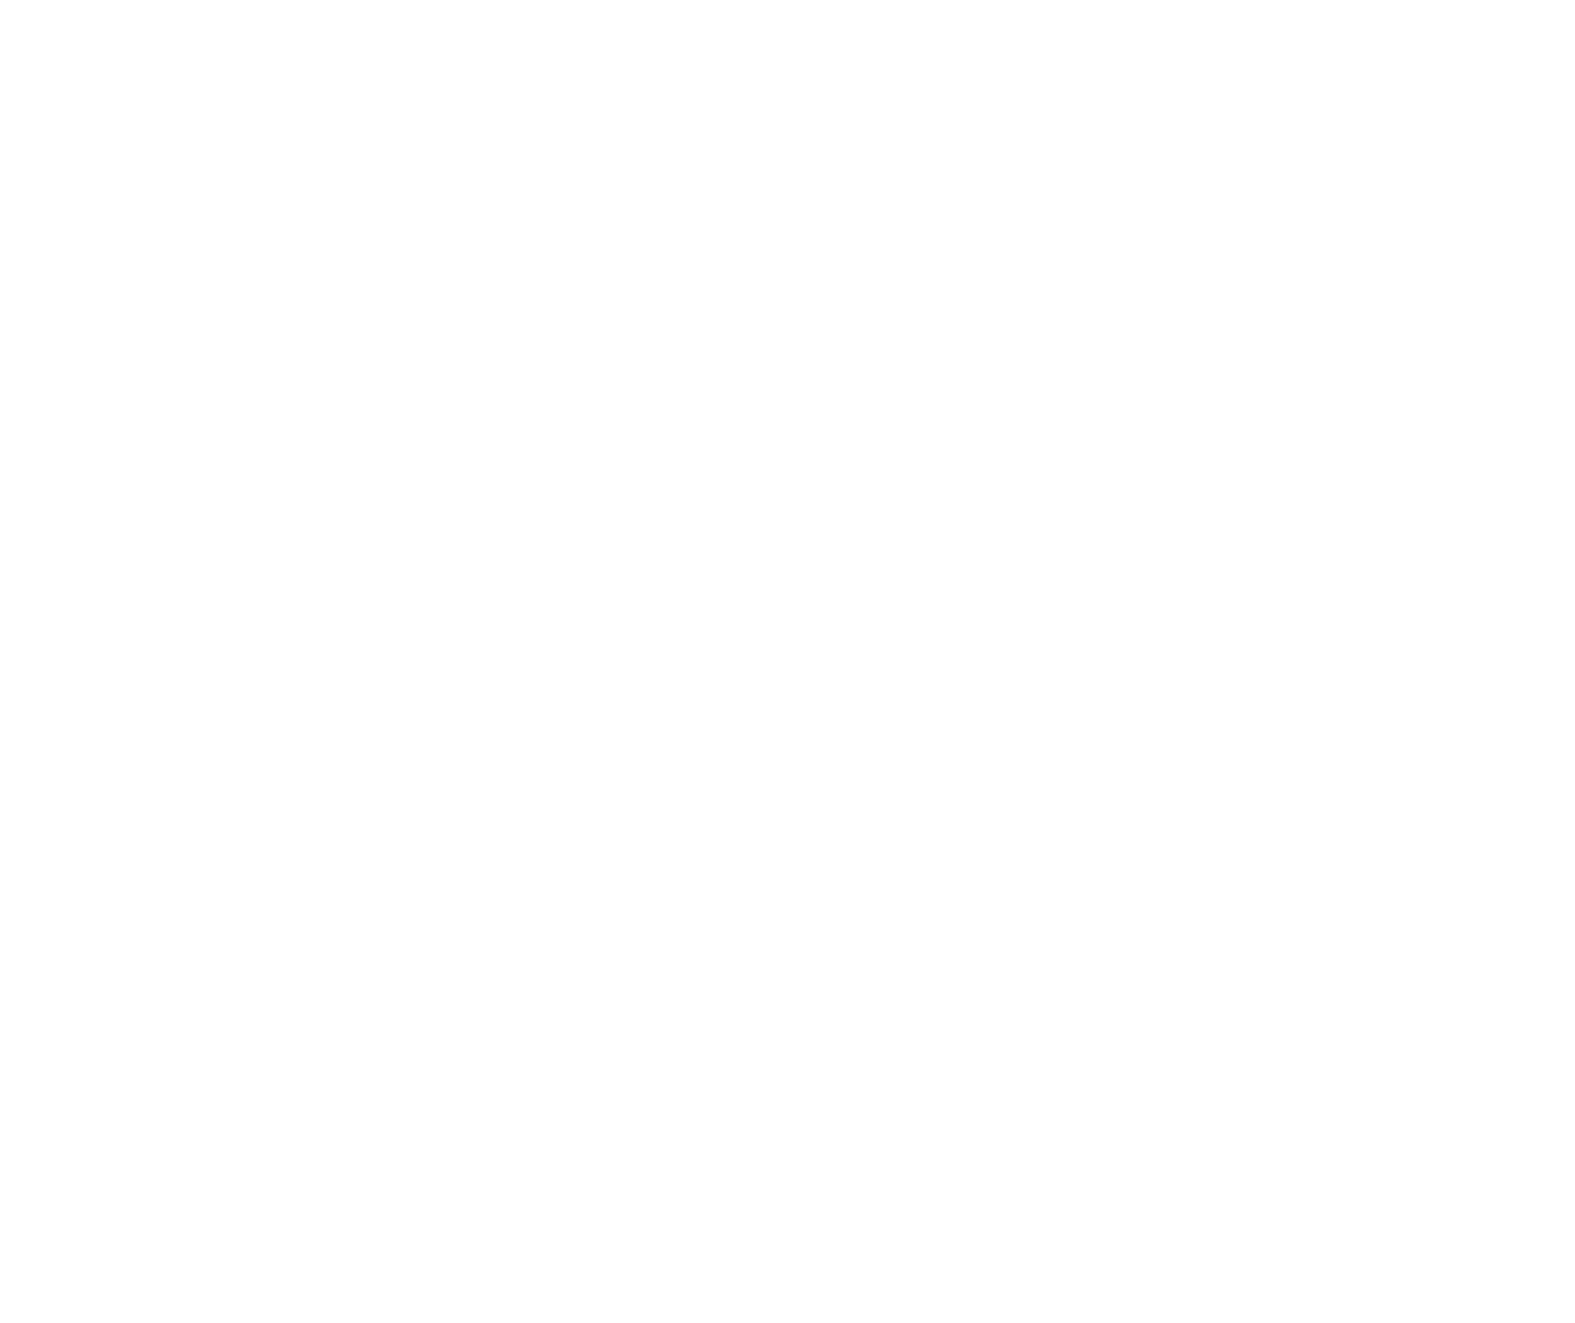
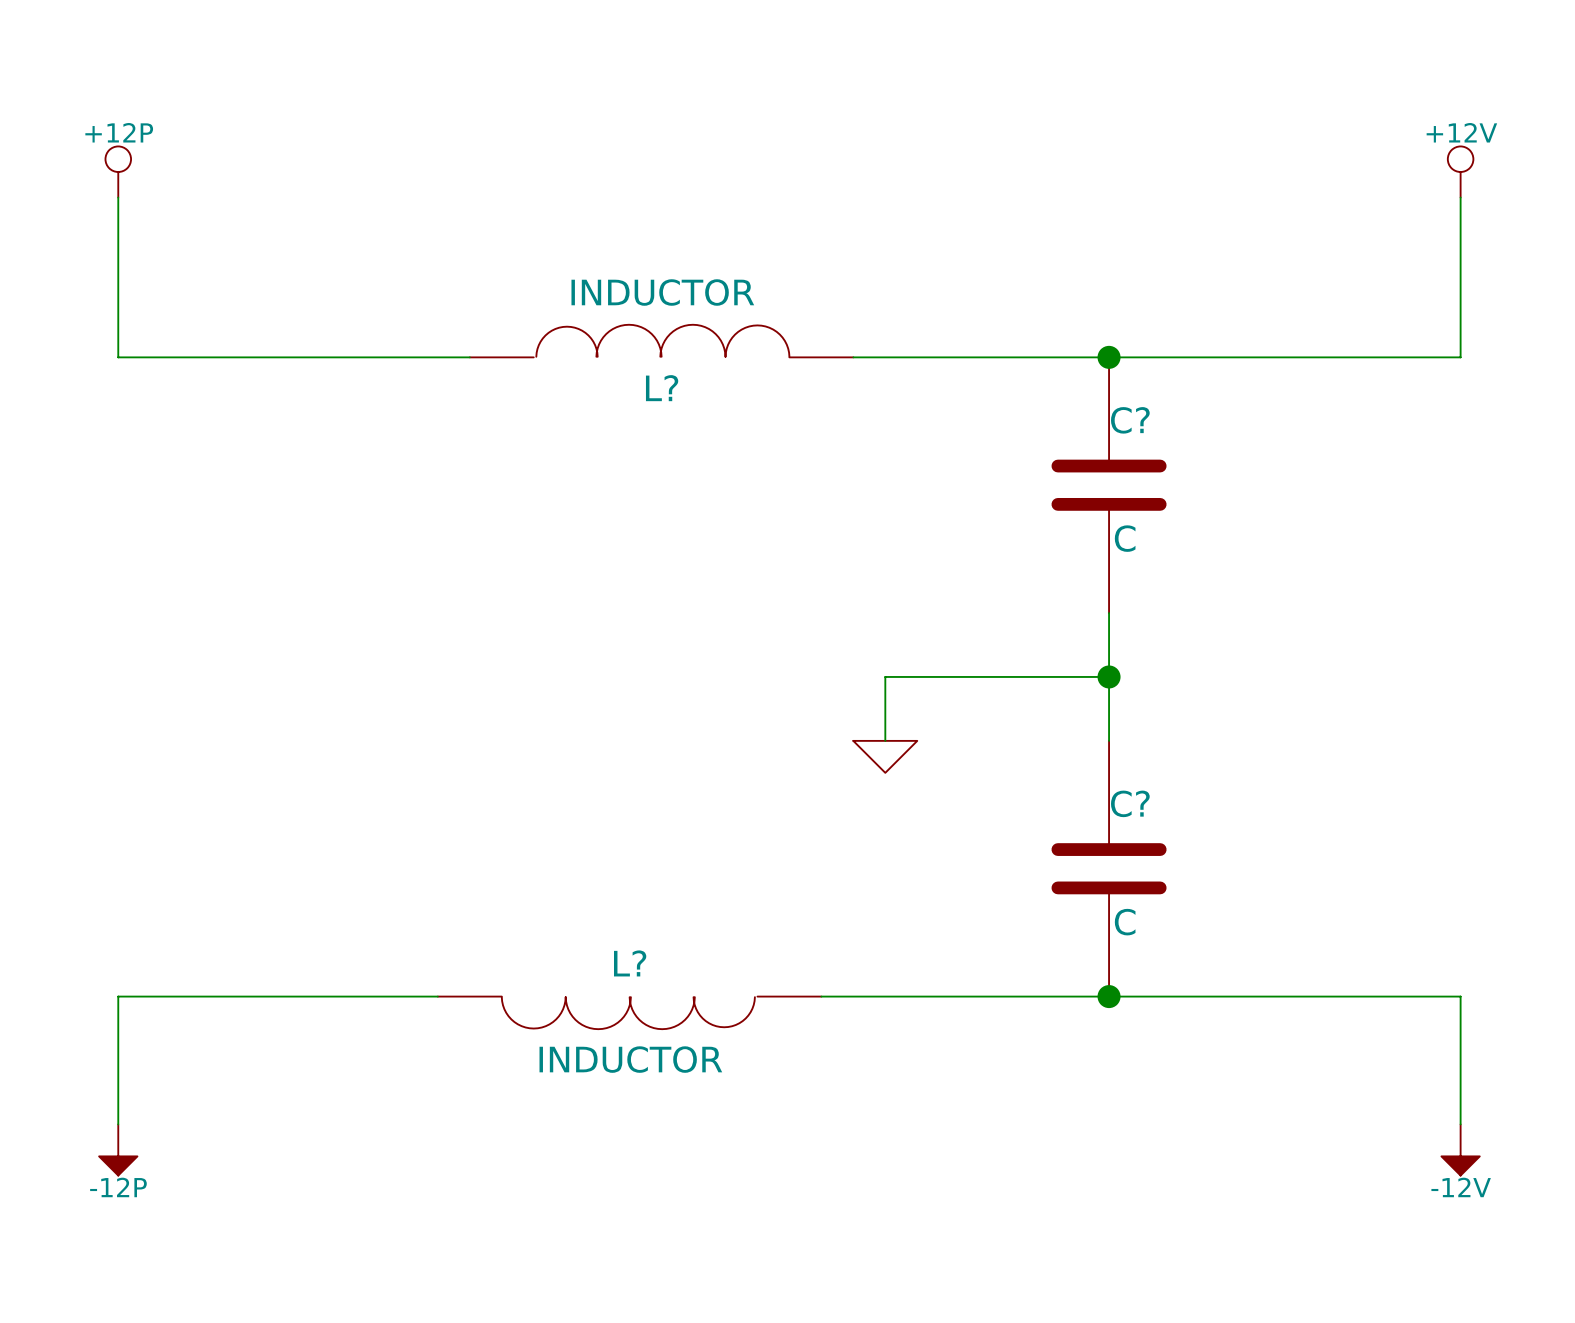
power symbol: none -> +12P (118, 171)
power symbol: none -> +12V (1460, 171)
wire: none -> (118, 197) (118, 357) (469, 357)
wire: none -> (1460, 197) (1460, 357) (853, 357)
L?: none -> INDUCTOR (661, 341)
junction: none -> (1109, 357)
C?: none -> C (1109, 485)
wire: none -> (1109, 613) (1109, 740)
wire: none -> (1109, 676) (885, 676) (885, 740)
junction: none -> (1109, 676)
power symbol: none -> (885, 756)
C?: none -> C (1109, 868)
wire: none -> (437, 996) (118, 996) (118, 1124)
wire: none -> (821, 996) (1460, 996) (1460, 1124)
junction: none -> (1109, 996)
L?: none -> INDUCTOR (629, 1012)
power symbol: none -> -12P (118, 1149)
power symbol: none -> -12V (1460, 1149)

